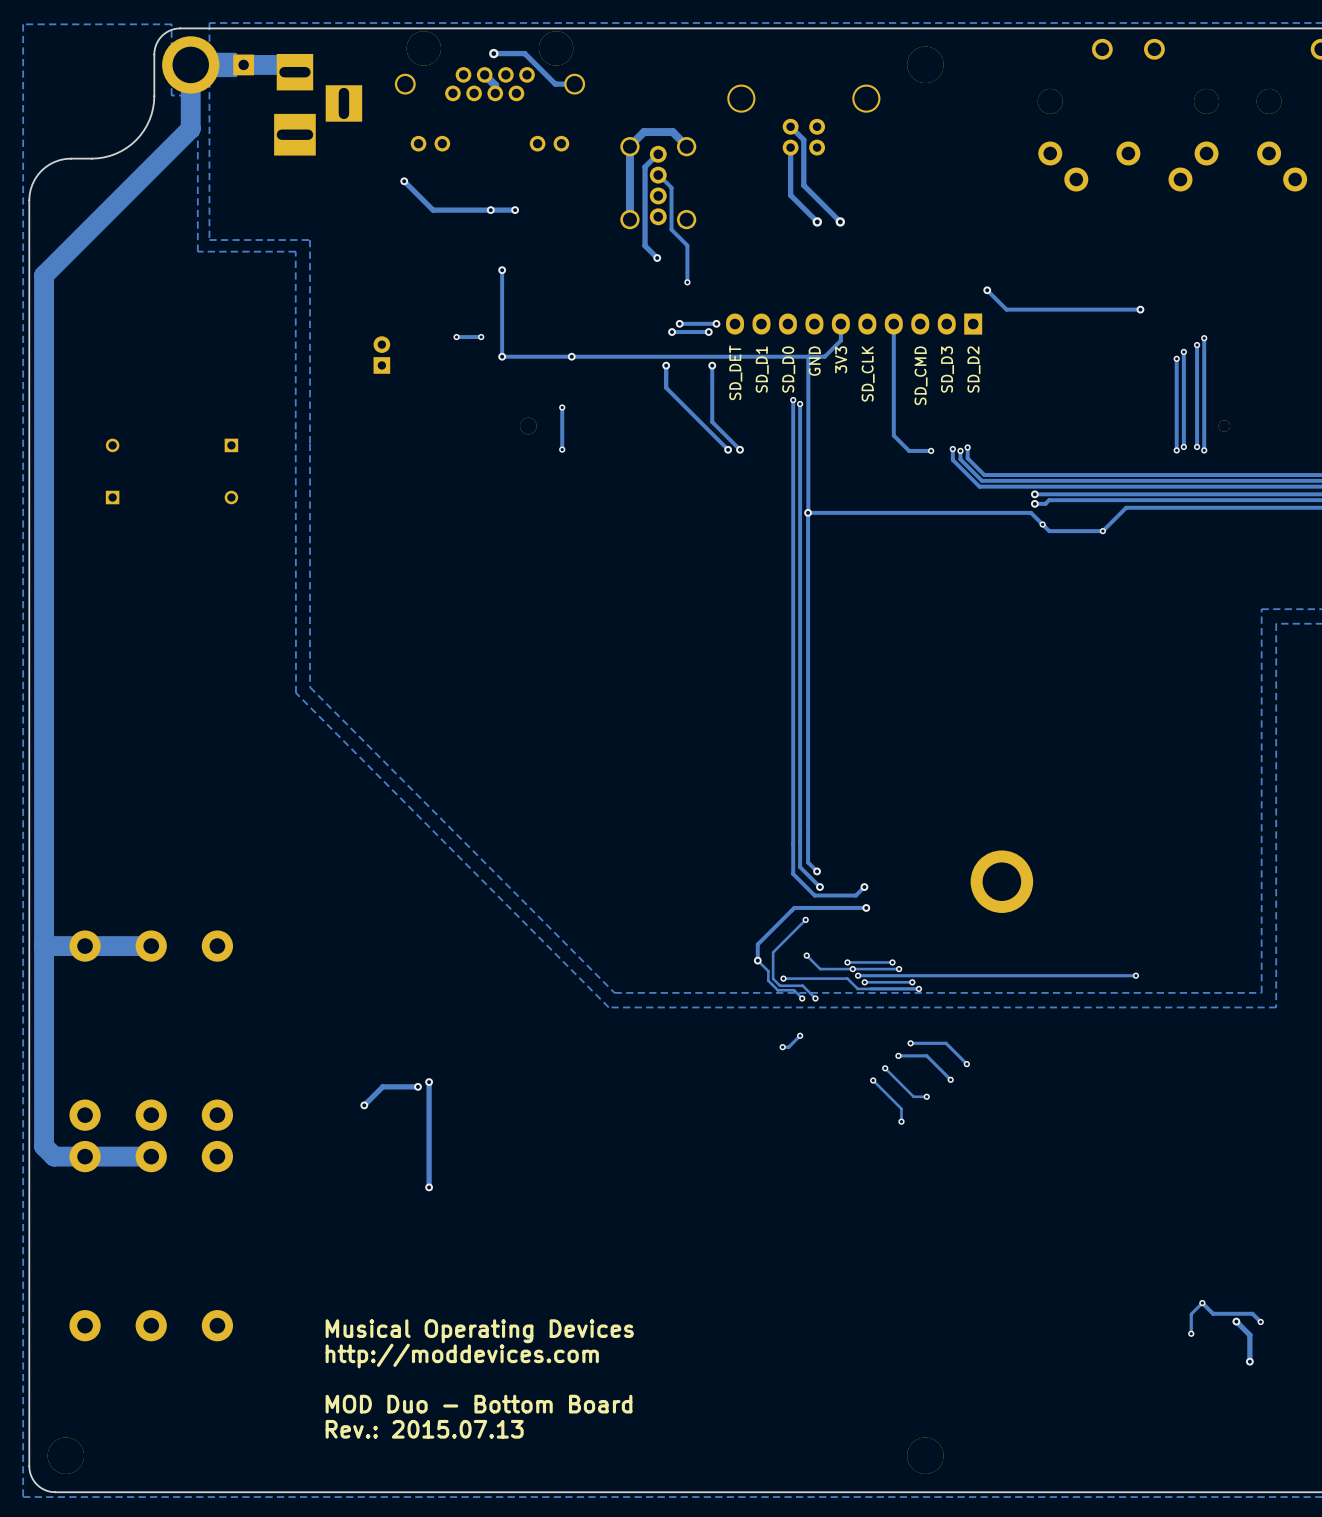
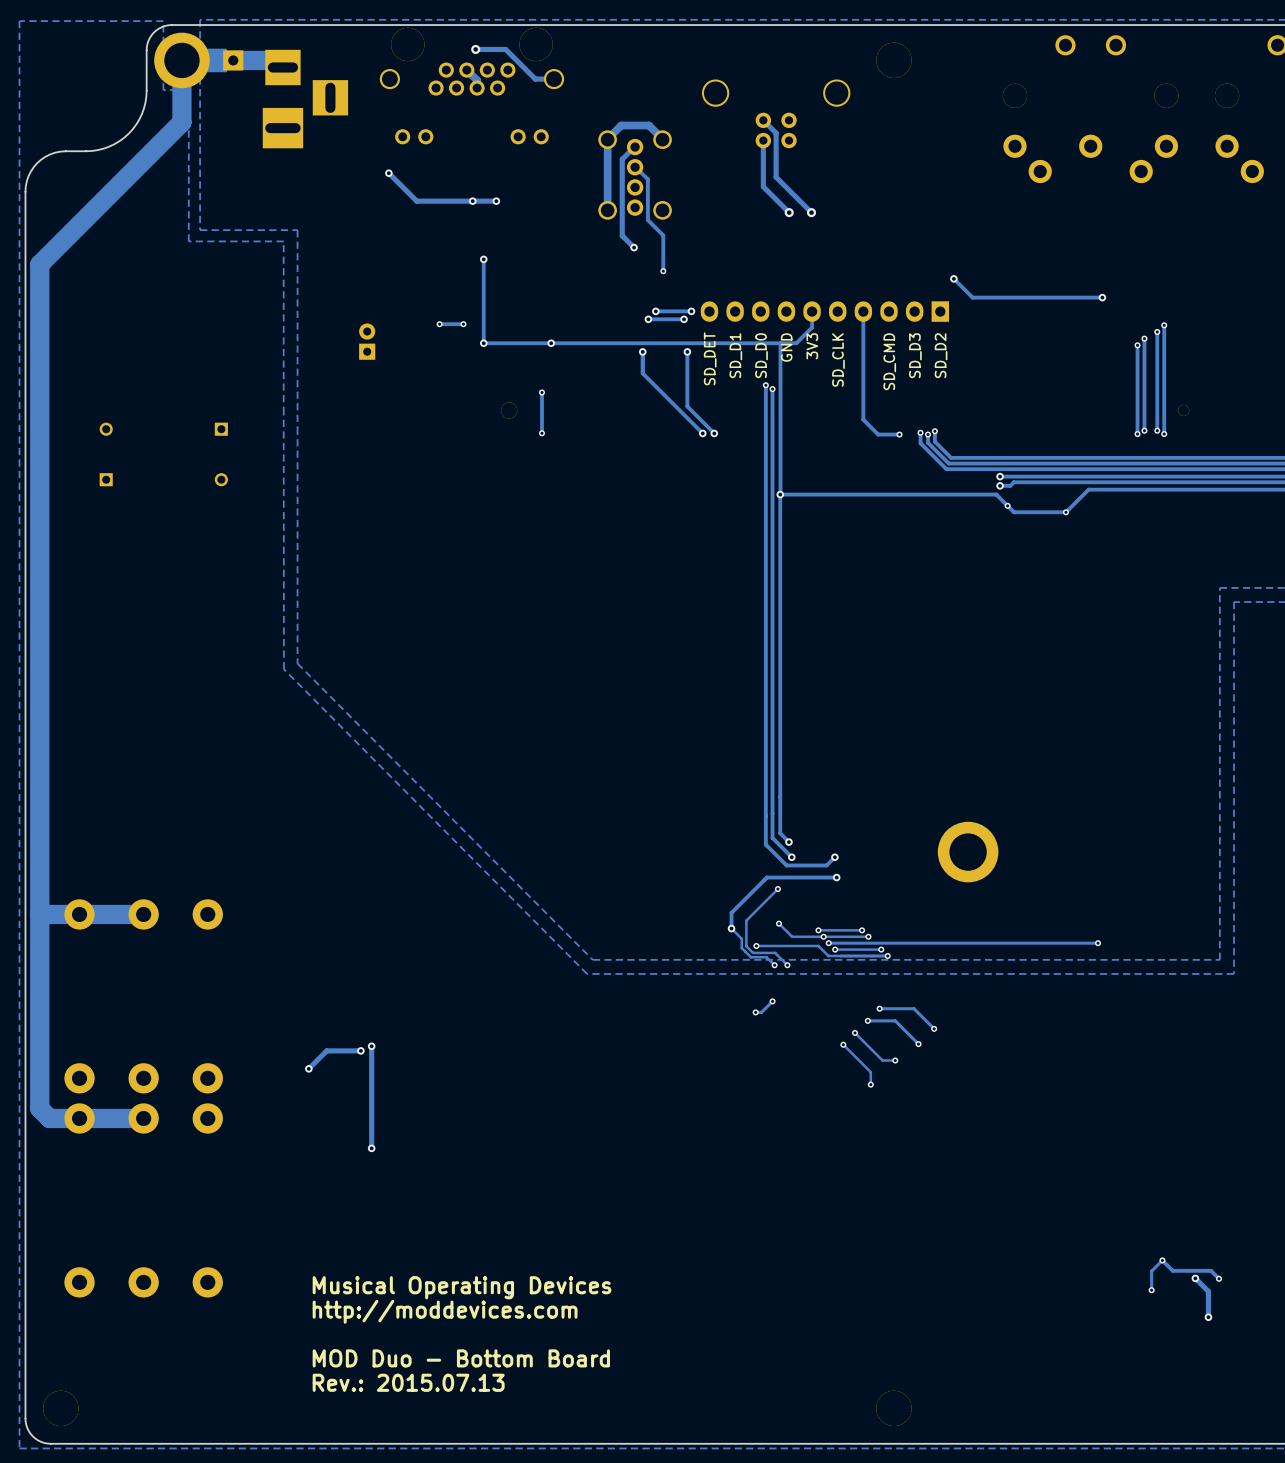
via: none -> (371, 1046)
track: (429, 1082) (429, 1187) -> (371, 1046) (371, 1148)
via: (429, 1082) -> none
via: none -> (360, 1050)
track: (417, 1086) (382, 1086) (364, 1105) -> (360, 1050) (326, 1050) (308, 1068)
via: (417, 1086) -> none
via: none -> (308, 1068)
via: (364, 1105) -> none
via: none -> (371, 1148)
via: (429, 1187) -> none

